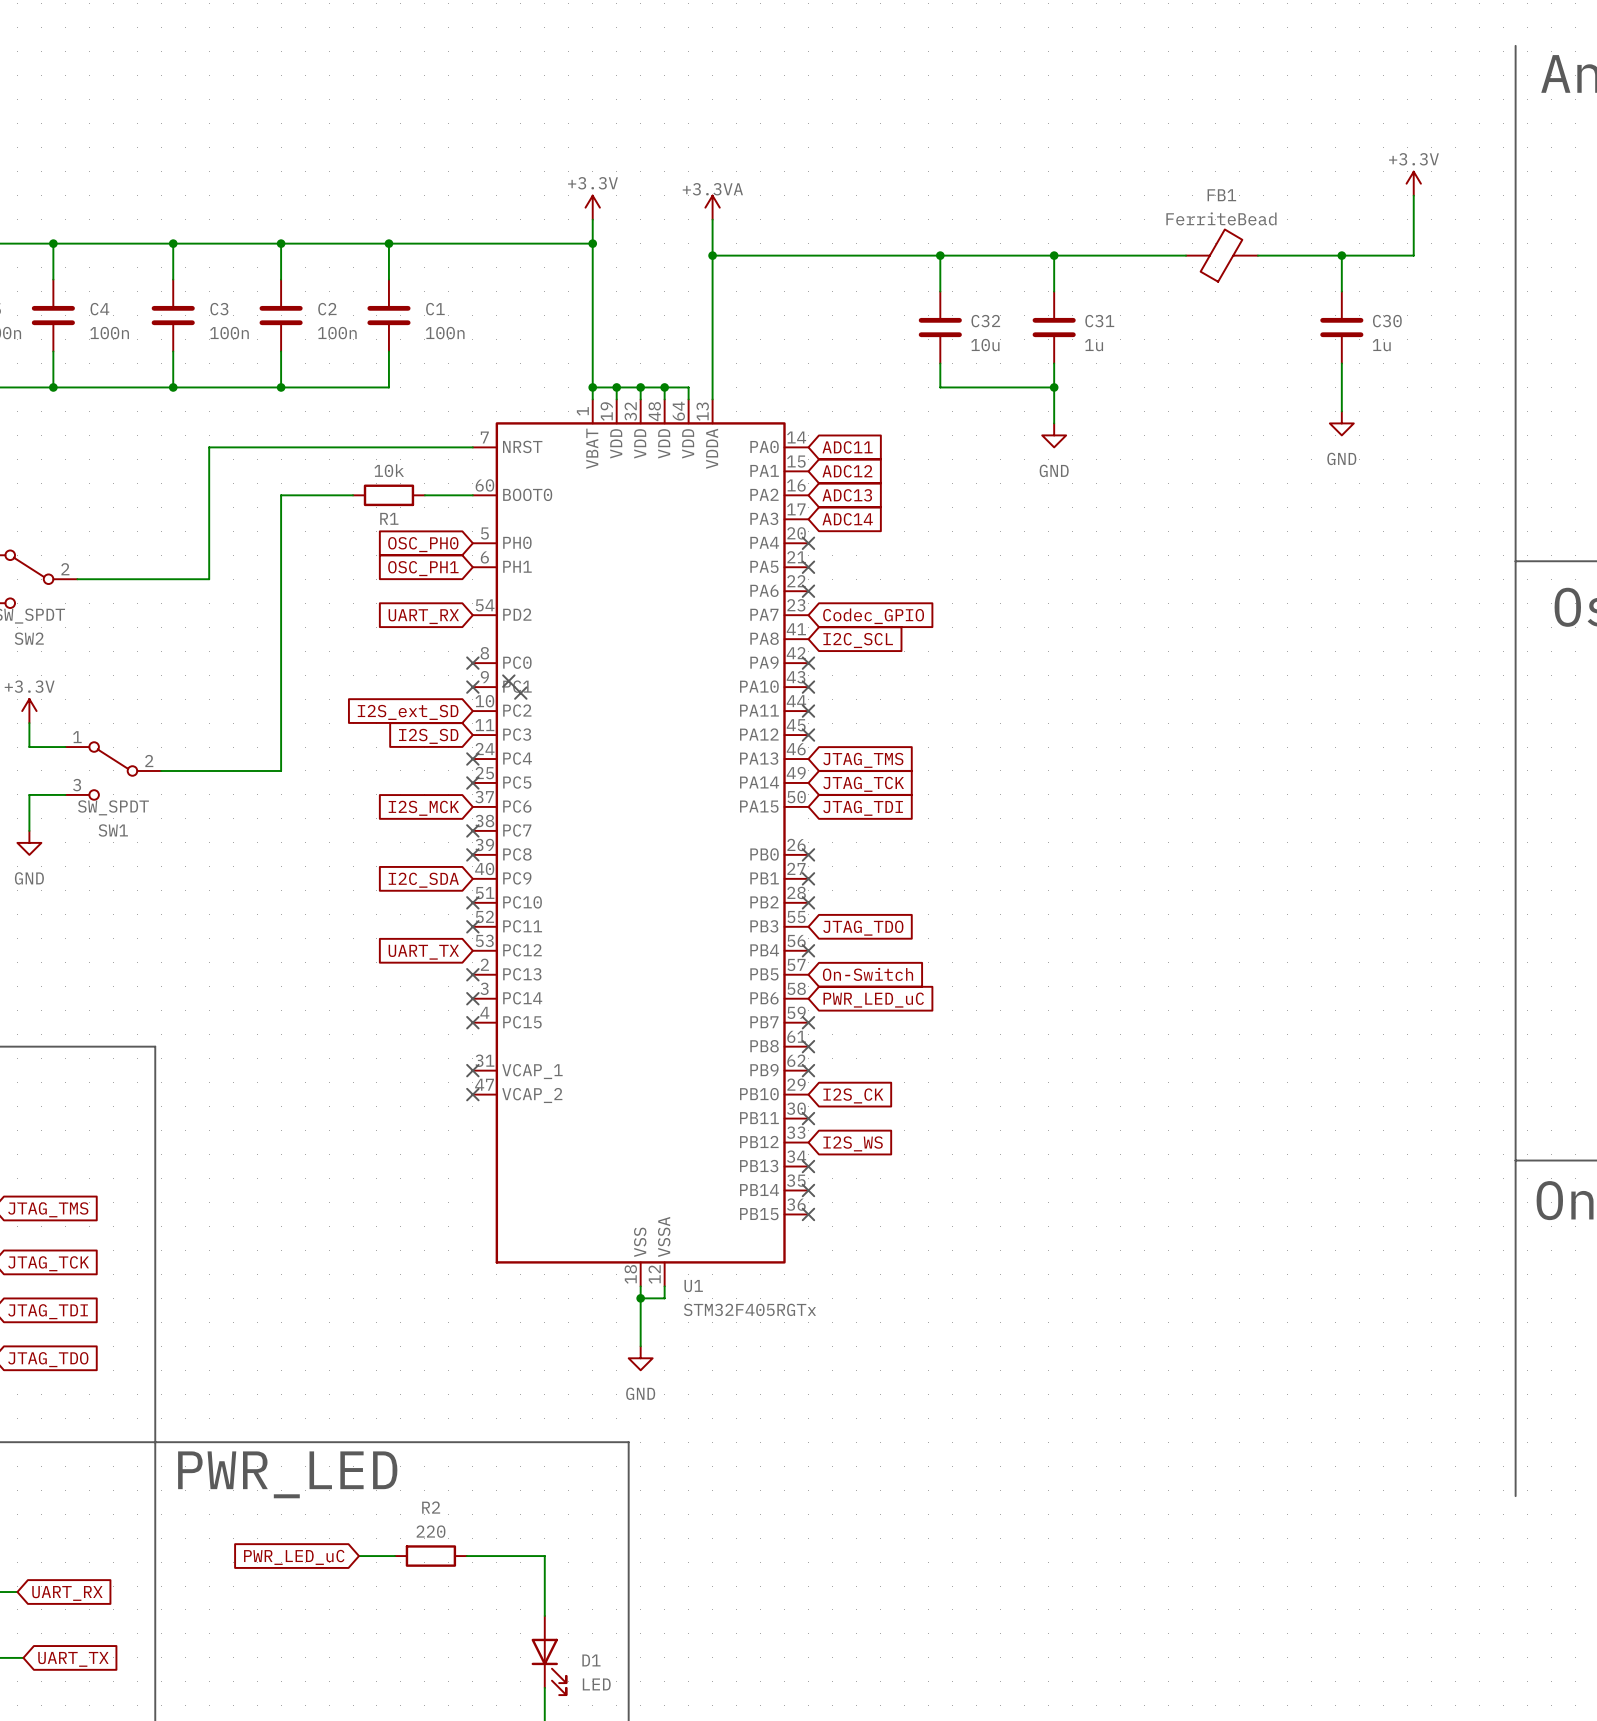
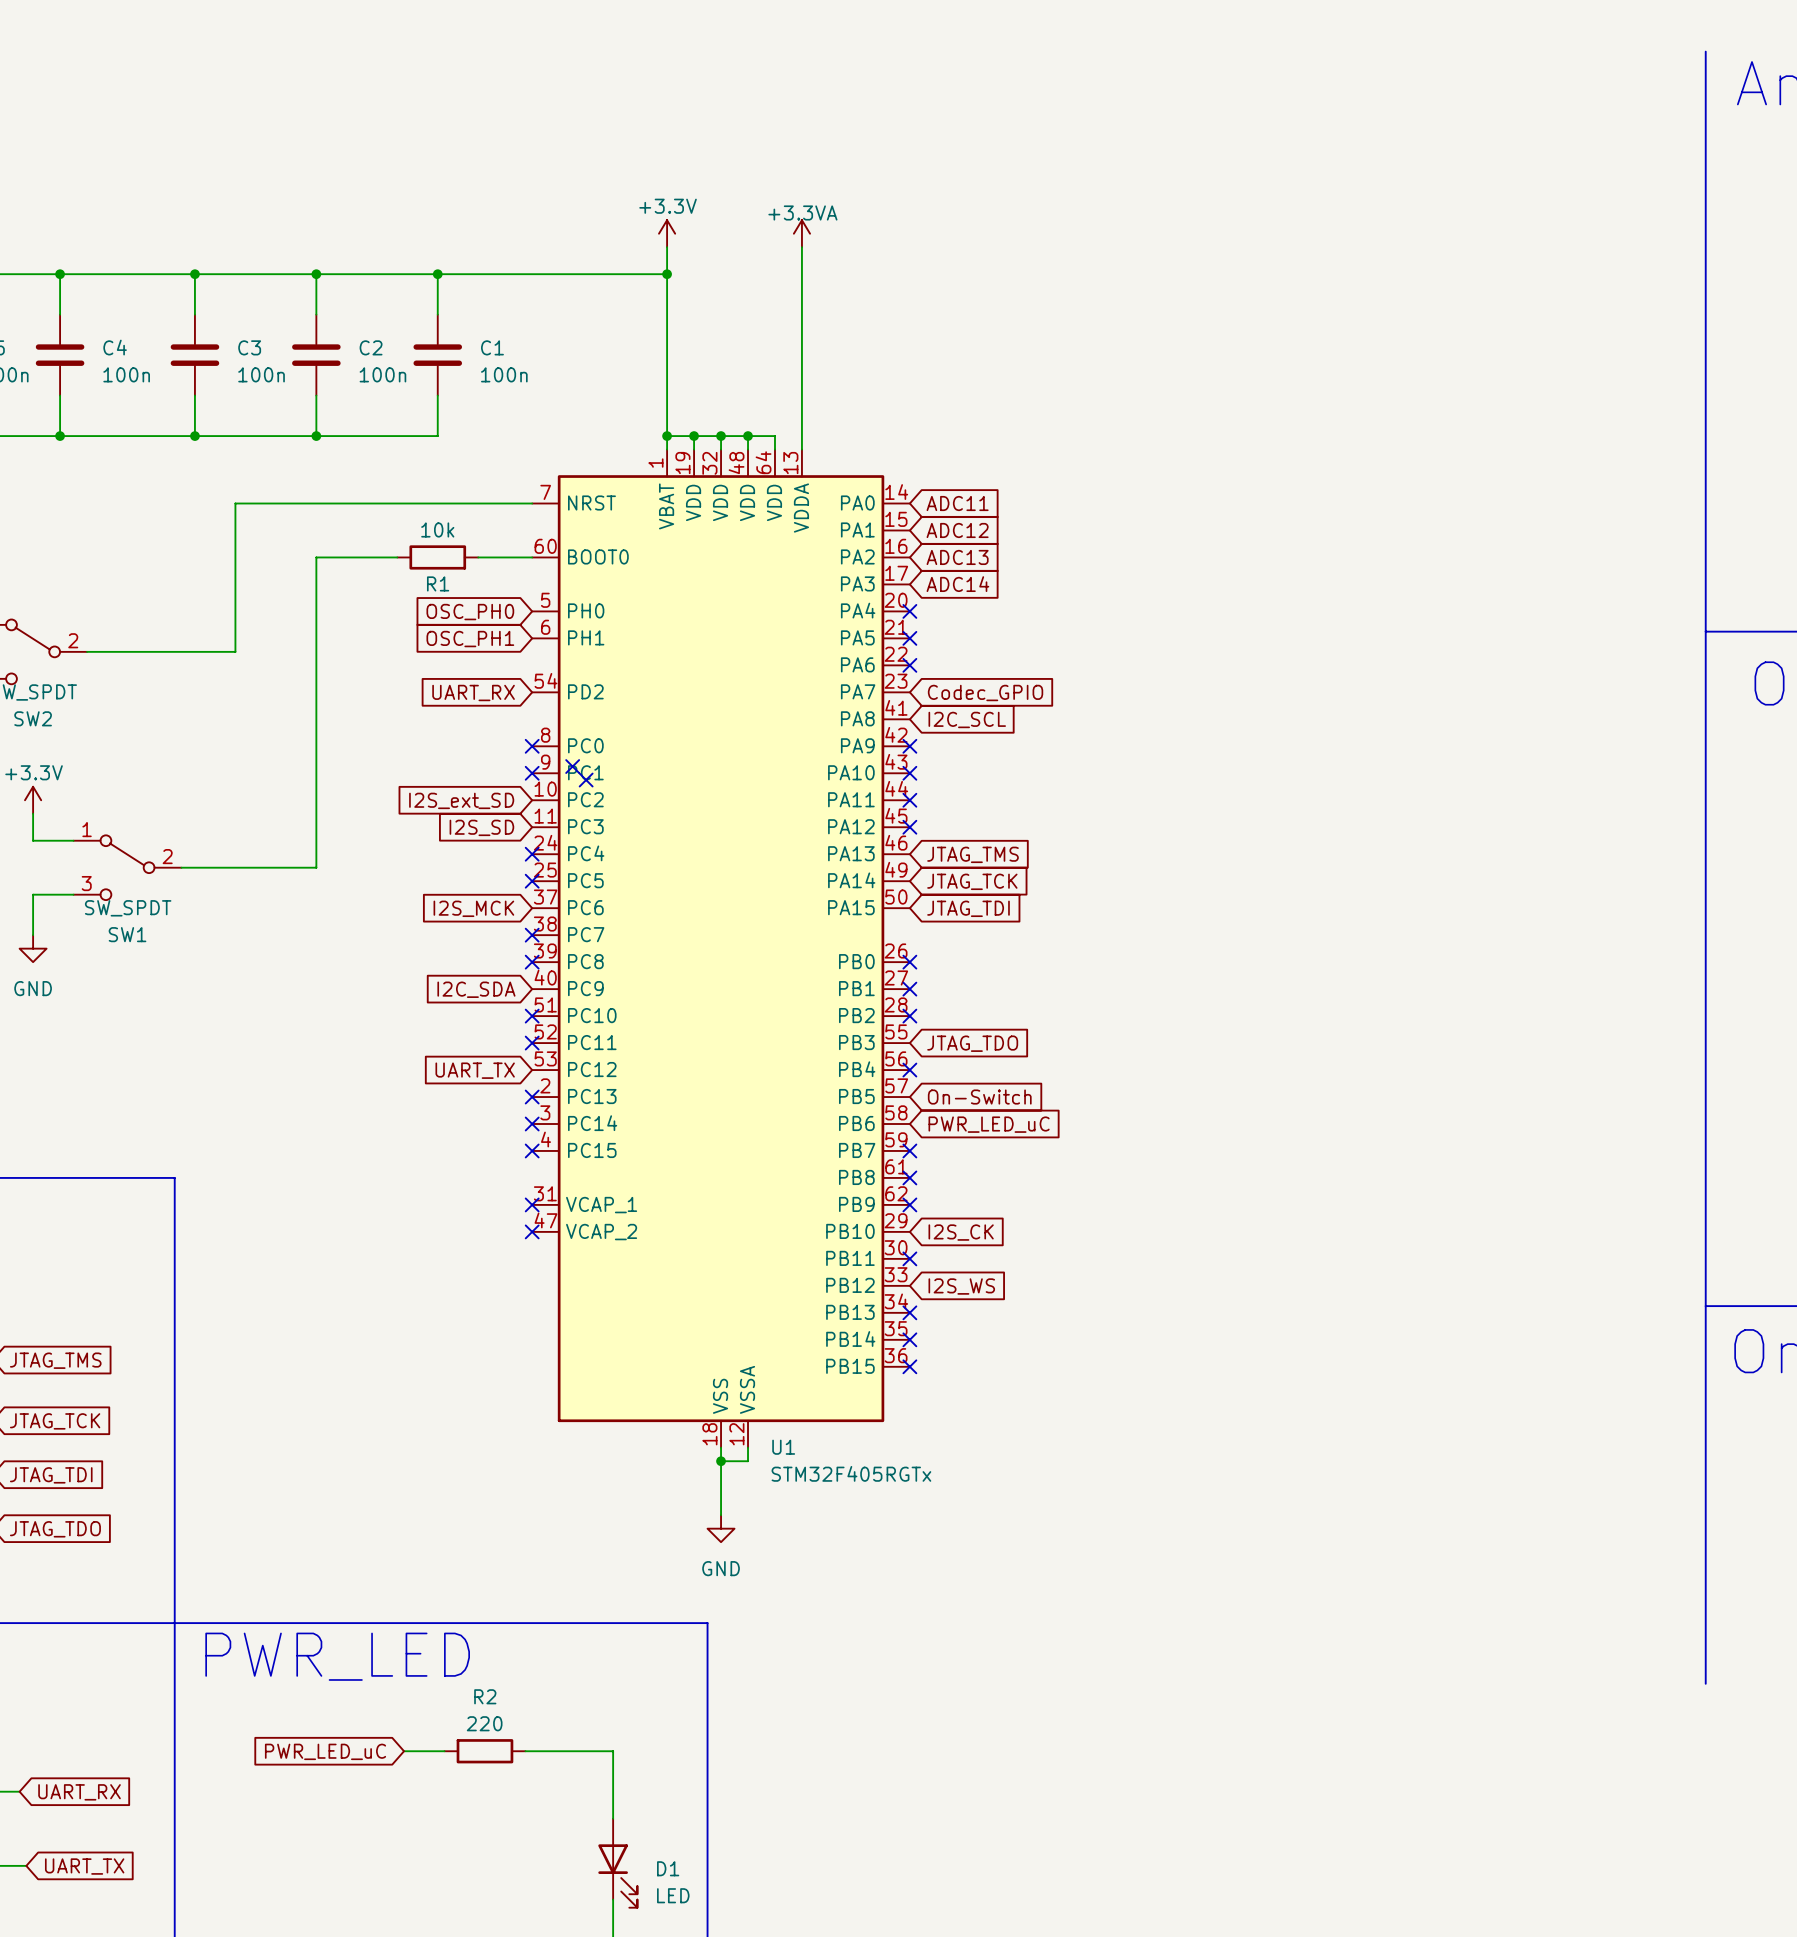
power symbol: +3.3V (1413, 183) -> none
wire: (1413, 195) (1413, 255) (1257, 255) -> none
wire: (712, 255) (1186, 255) -> none
junction: (712, 255) -> none
wire: (940, 255) (940, 291) -> none
junction: (940, 255) -> none
wire: (1054, 255) (1054, 291) -> none
junction: (1054, 255) -> none
FB1: FerriteBead (1221, 255) -> none
wire: (1341, 255) (1341, 291) -> none
junction: (1341, 255) -> none
C32: 10u (940, 327) -> none
C31: 1u (1054, 327) -> none
C30: 1u (1341, 327) -> none
wire: (940, 363) (940, 387) (1054, 387) -> none
wire: (1054, 363) (1054, 423) -> none
wire: (1341, 363) (1341, 411) -> none
junction: (1054, 387) -> none
power symbol: GND (1341, 423) -> none
power symbol: GND (1054, 435) -> none

